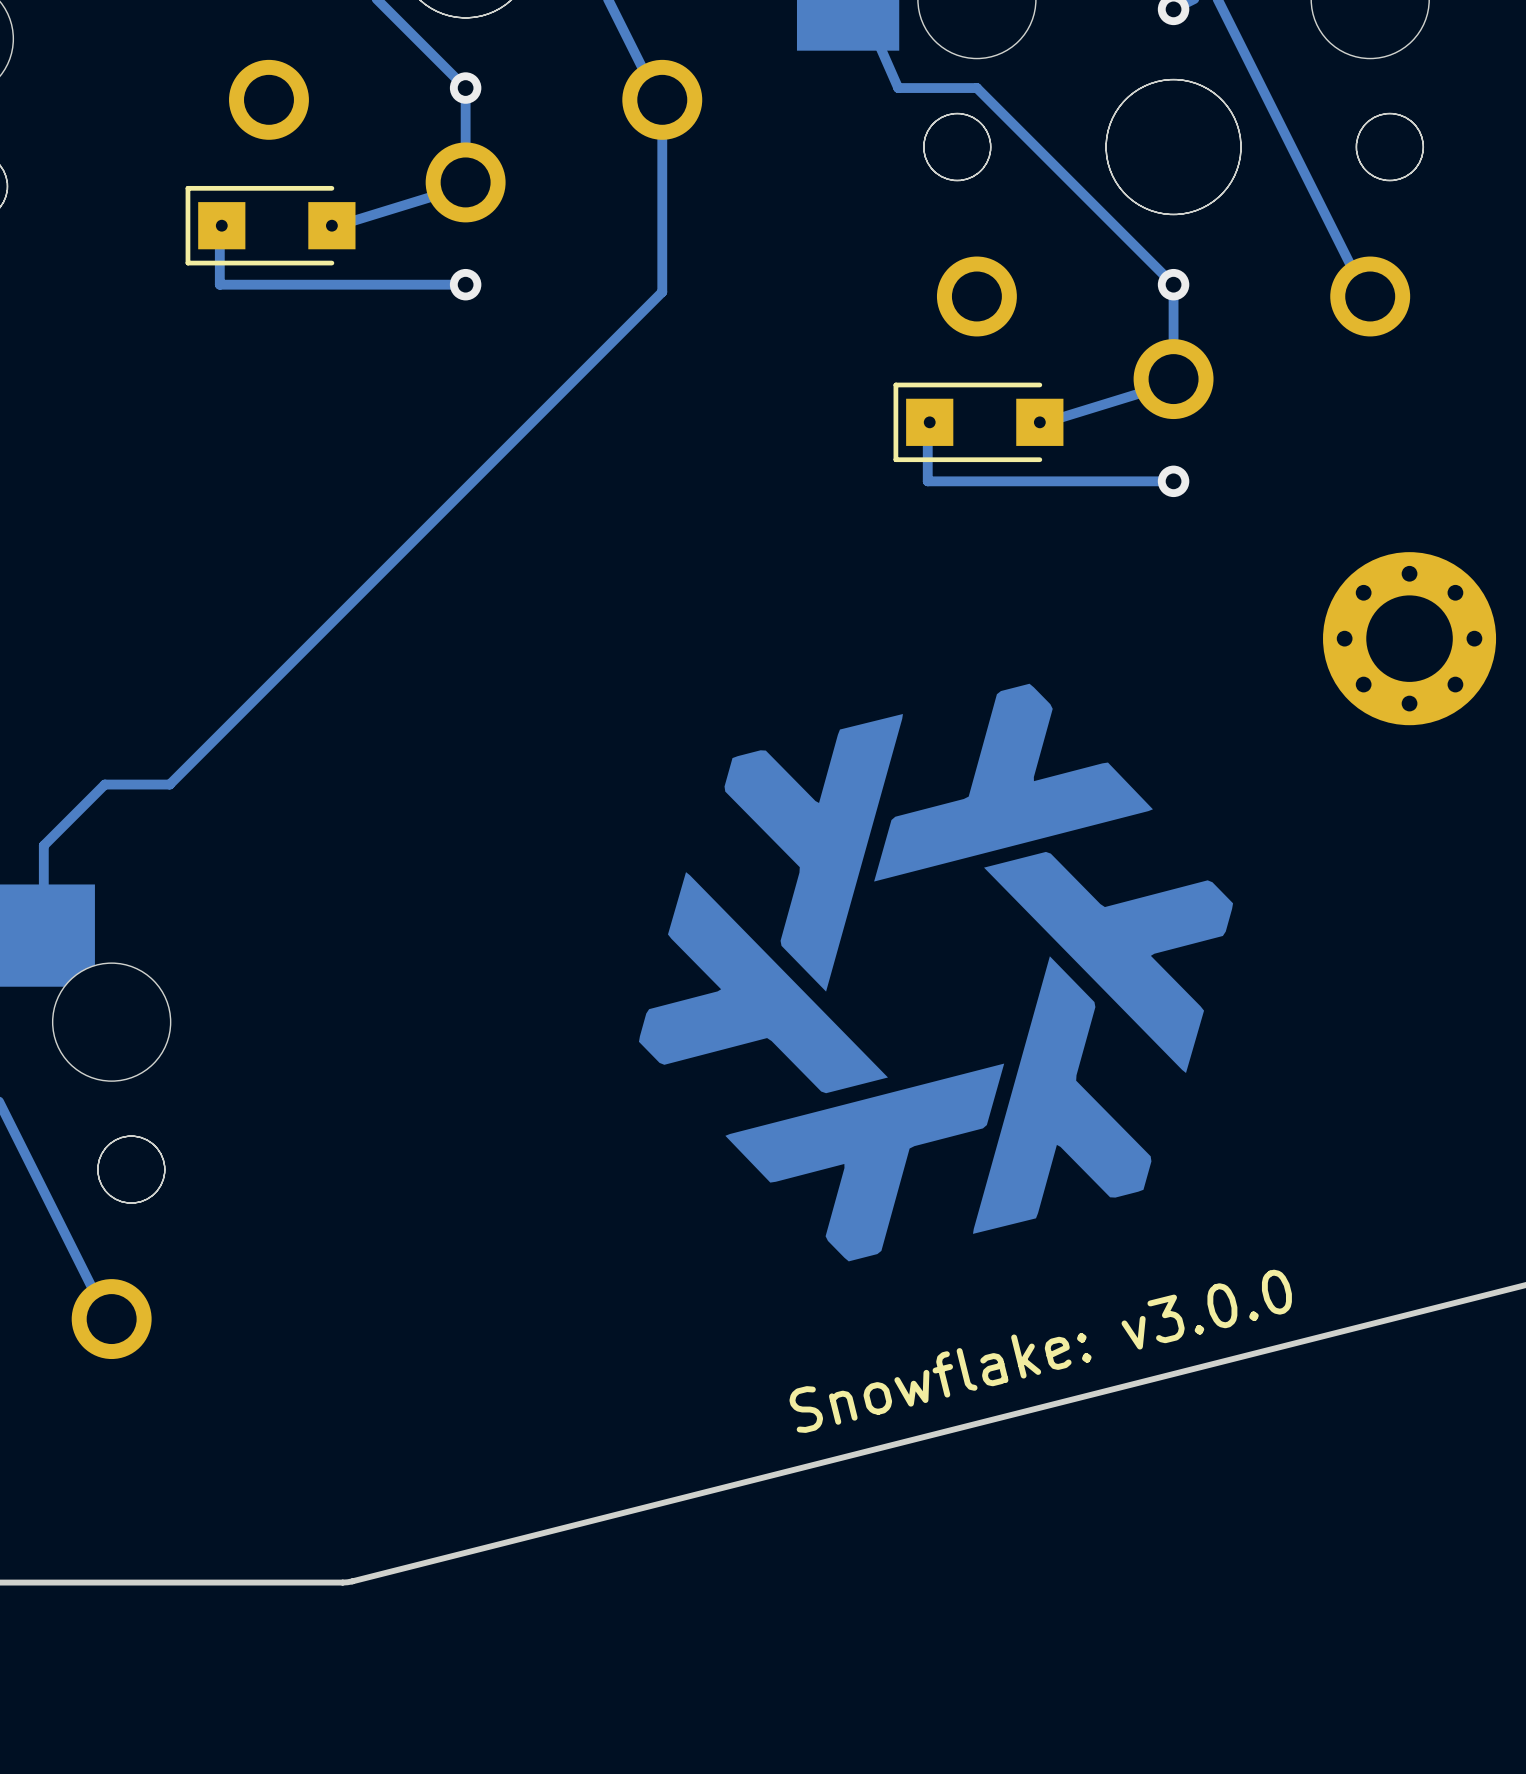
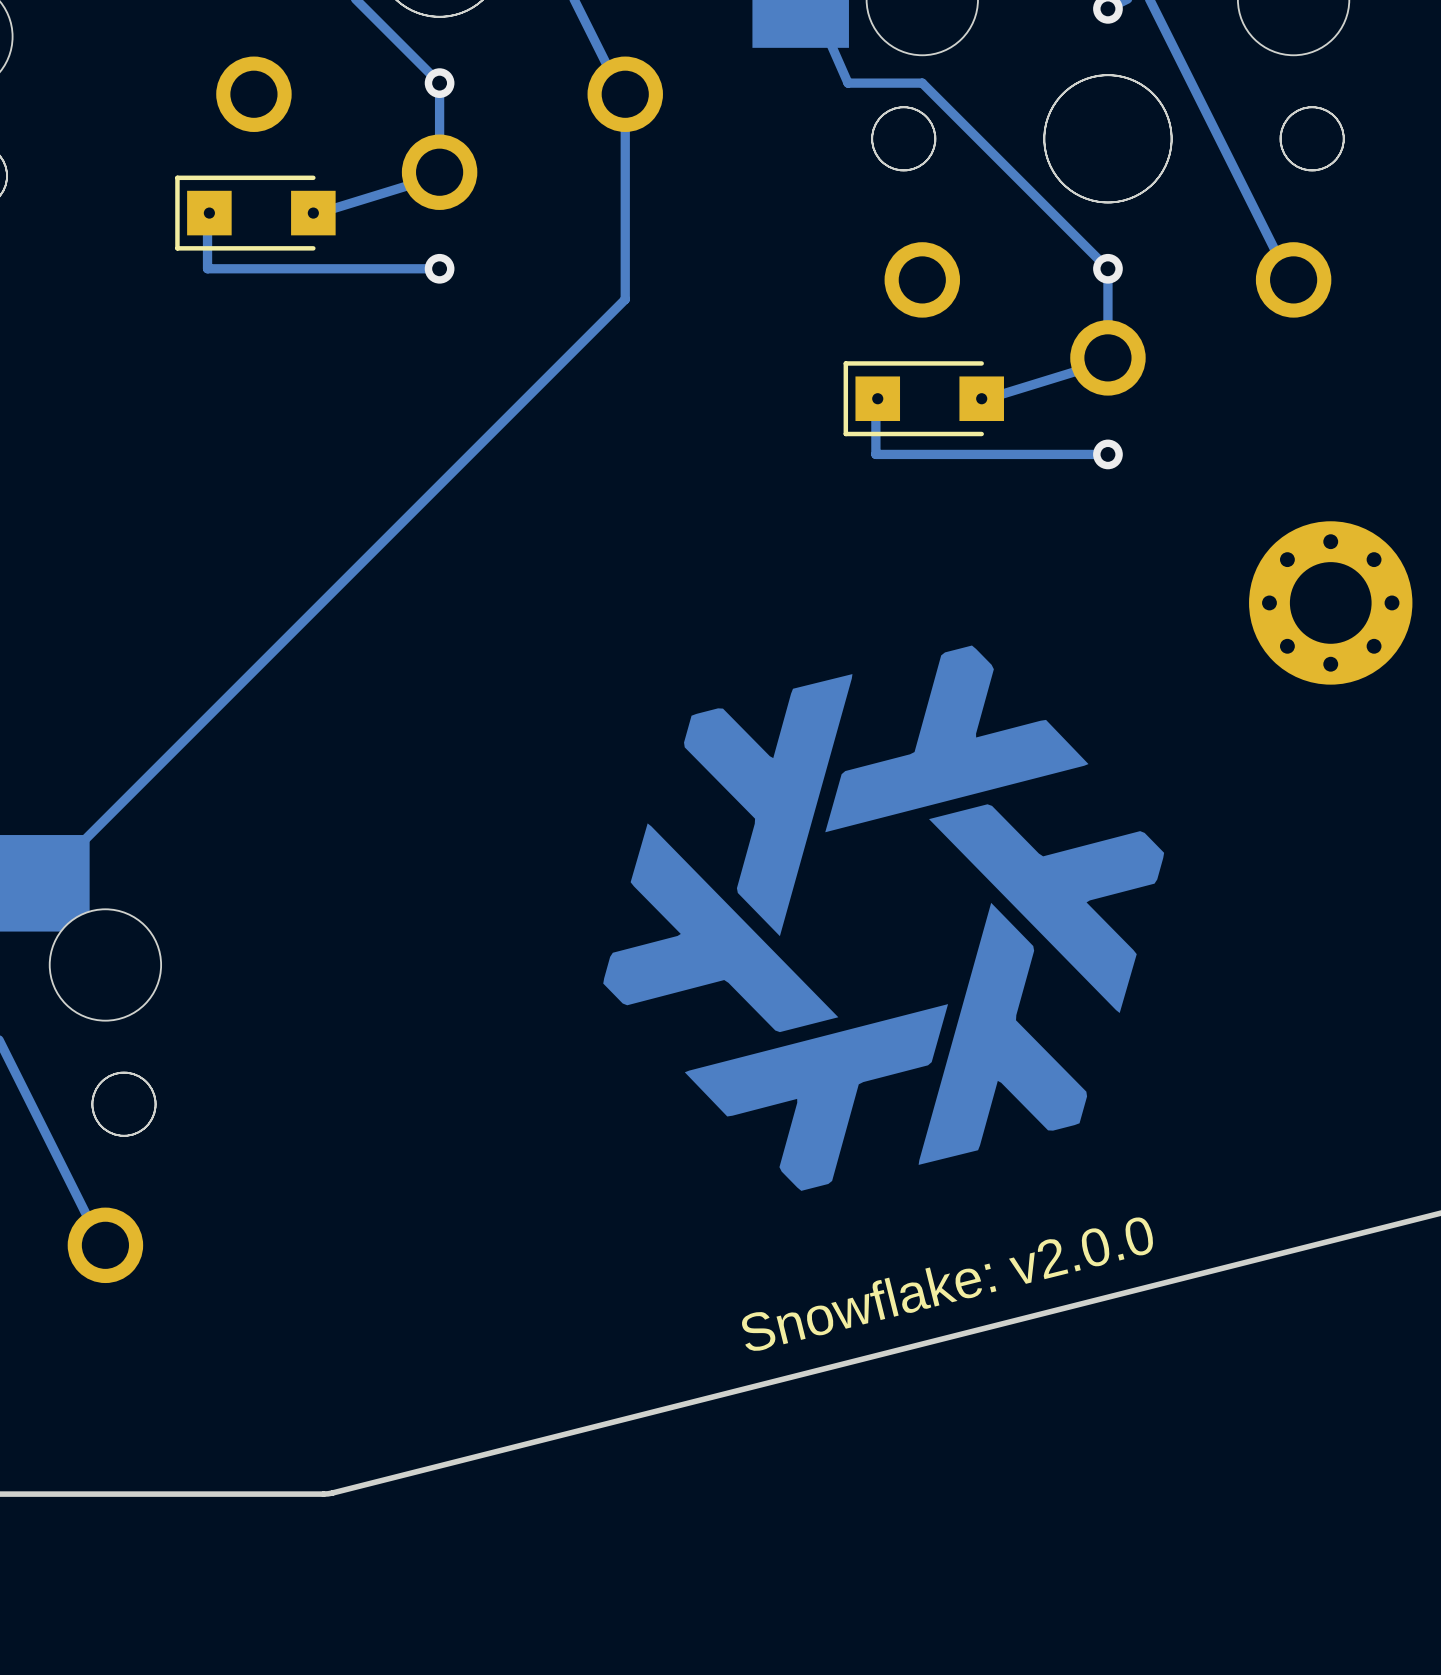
track: (662, 292) (169, 784) (104, 784) (43, 845) (43, 935) -> (625, 275) (625, 299) (41, 883)
text: Snowflake: v3.0.0 (1040, 1351) -> Snowflake: v2.0.0 (947, 1284)

